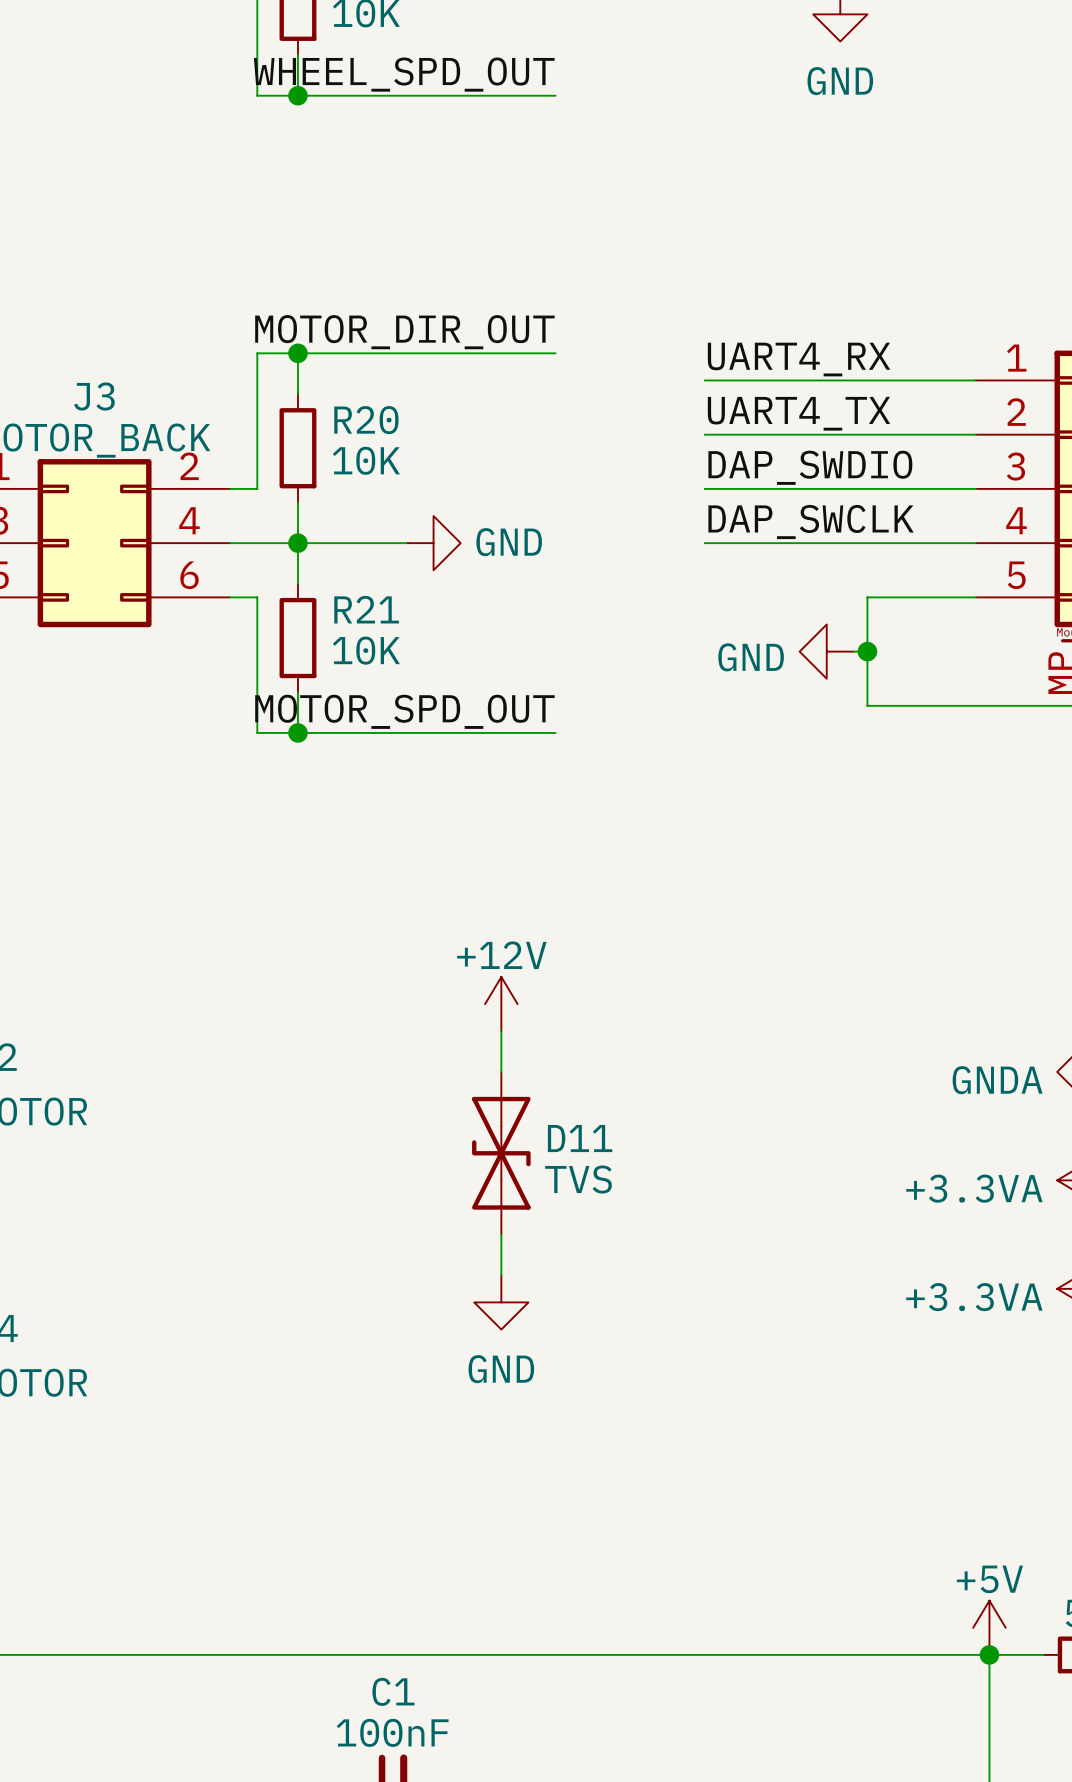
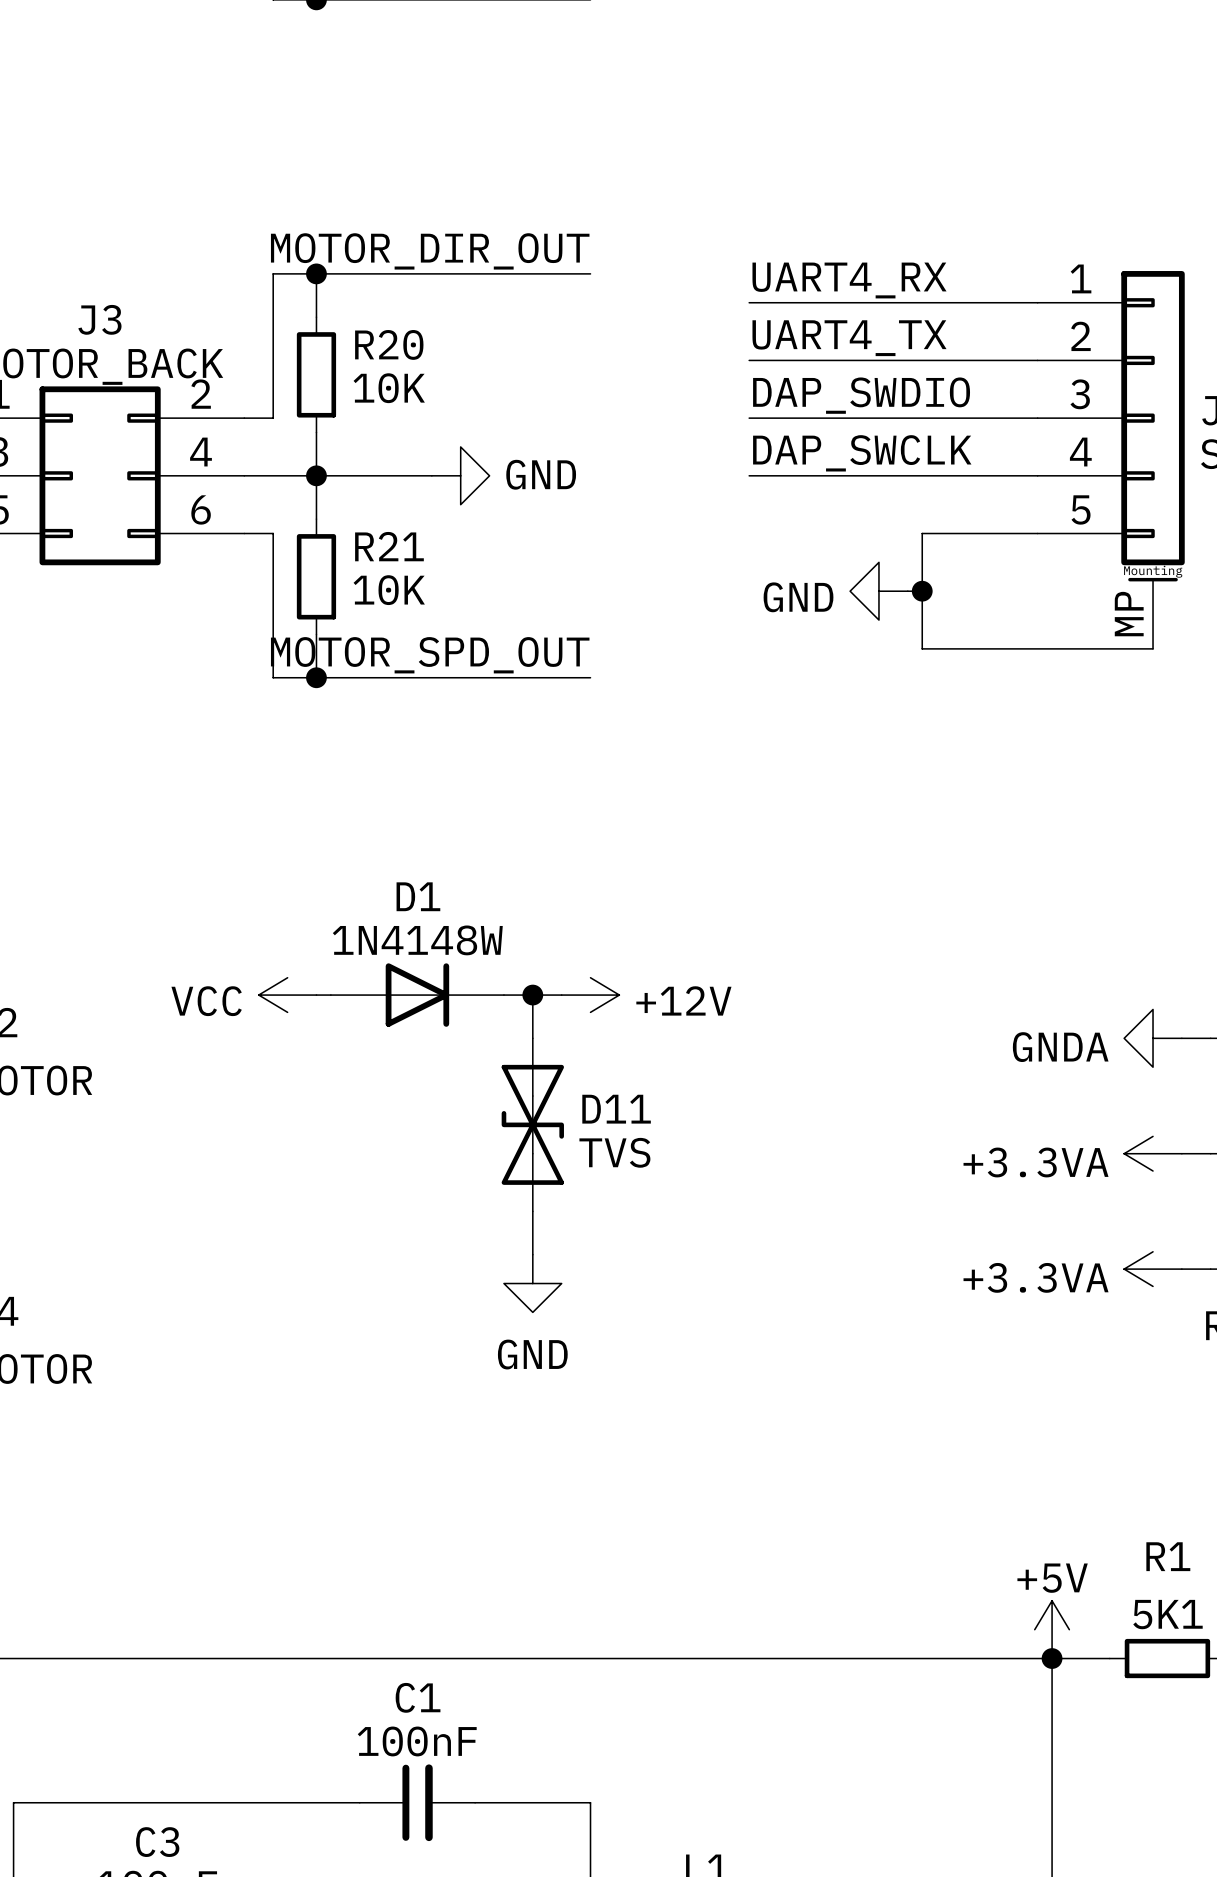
power symbol text position: +12V (501, 955) -> +12V (683, 1000)
power symbol rotation: 0° (501, 1004) -> 90° clockwise (590, 995)
power symbol position: +12V (501, 1004) -> +12V (590, 995)
power symbol: none -> VCC (287, 995)
wire: none -> (316, 995) (330, 995)
D1: none -> 1N4148W (417, 995)
wire: none -> (503, 995) (561, 995)
junction: none -> (532, 995)

